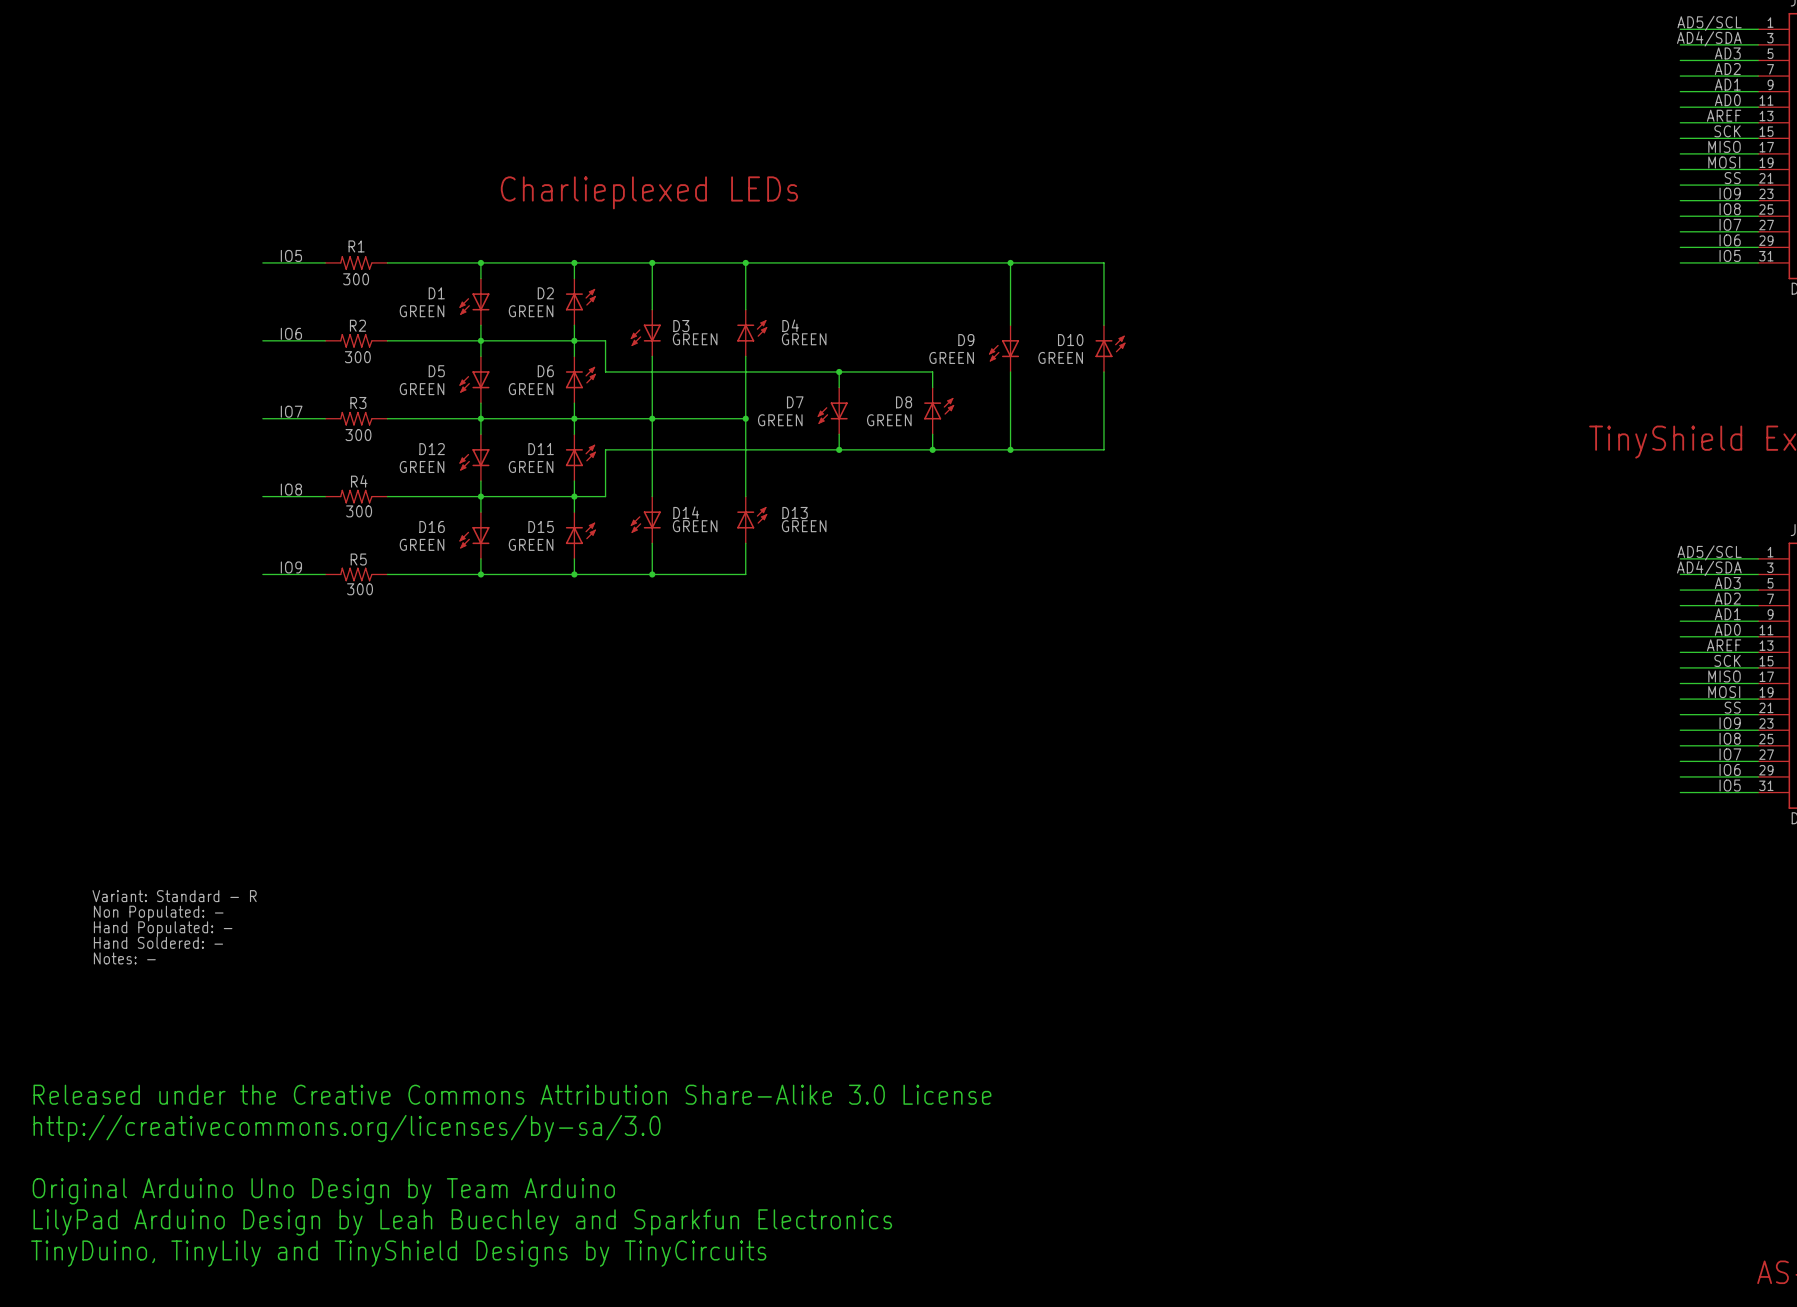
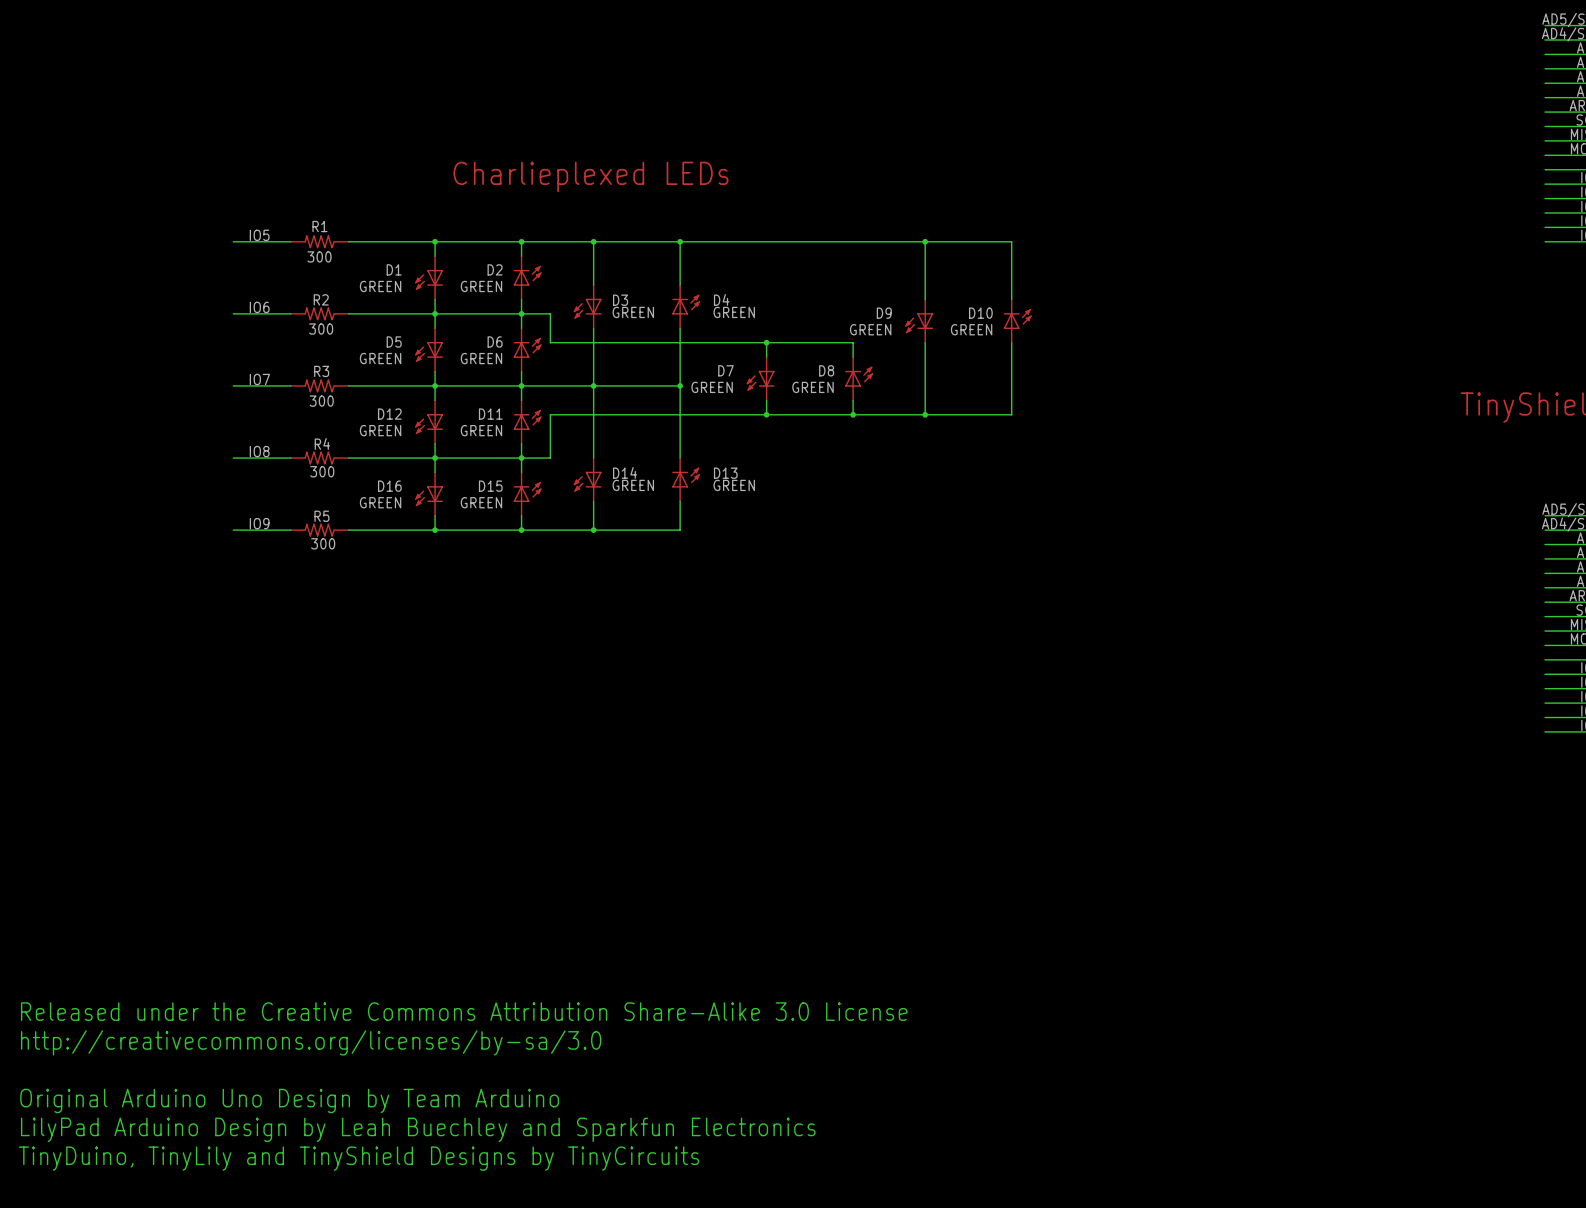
text: Variant: Standard - R (174, 896) -> none
text: Non Populated: - (158, 913) -> none
text: Hand Populated: - (163, 929) -> none
text: Hand Soldered: - (158, 942) -> none
text: Notes: - (124, 958) -> none

